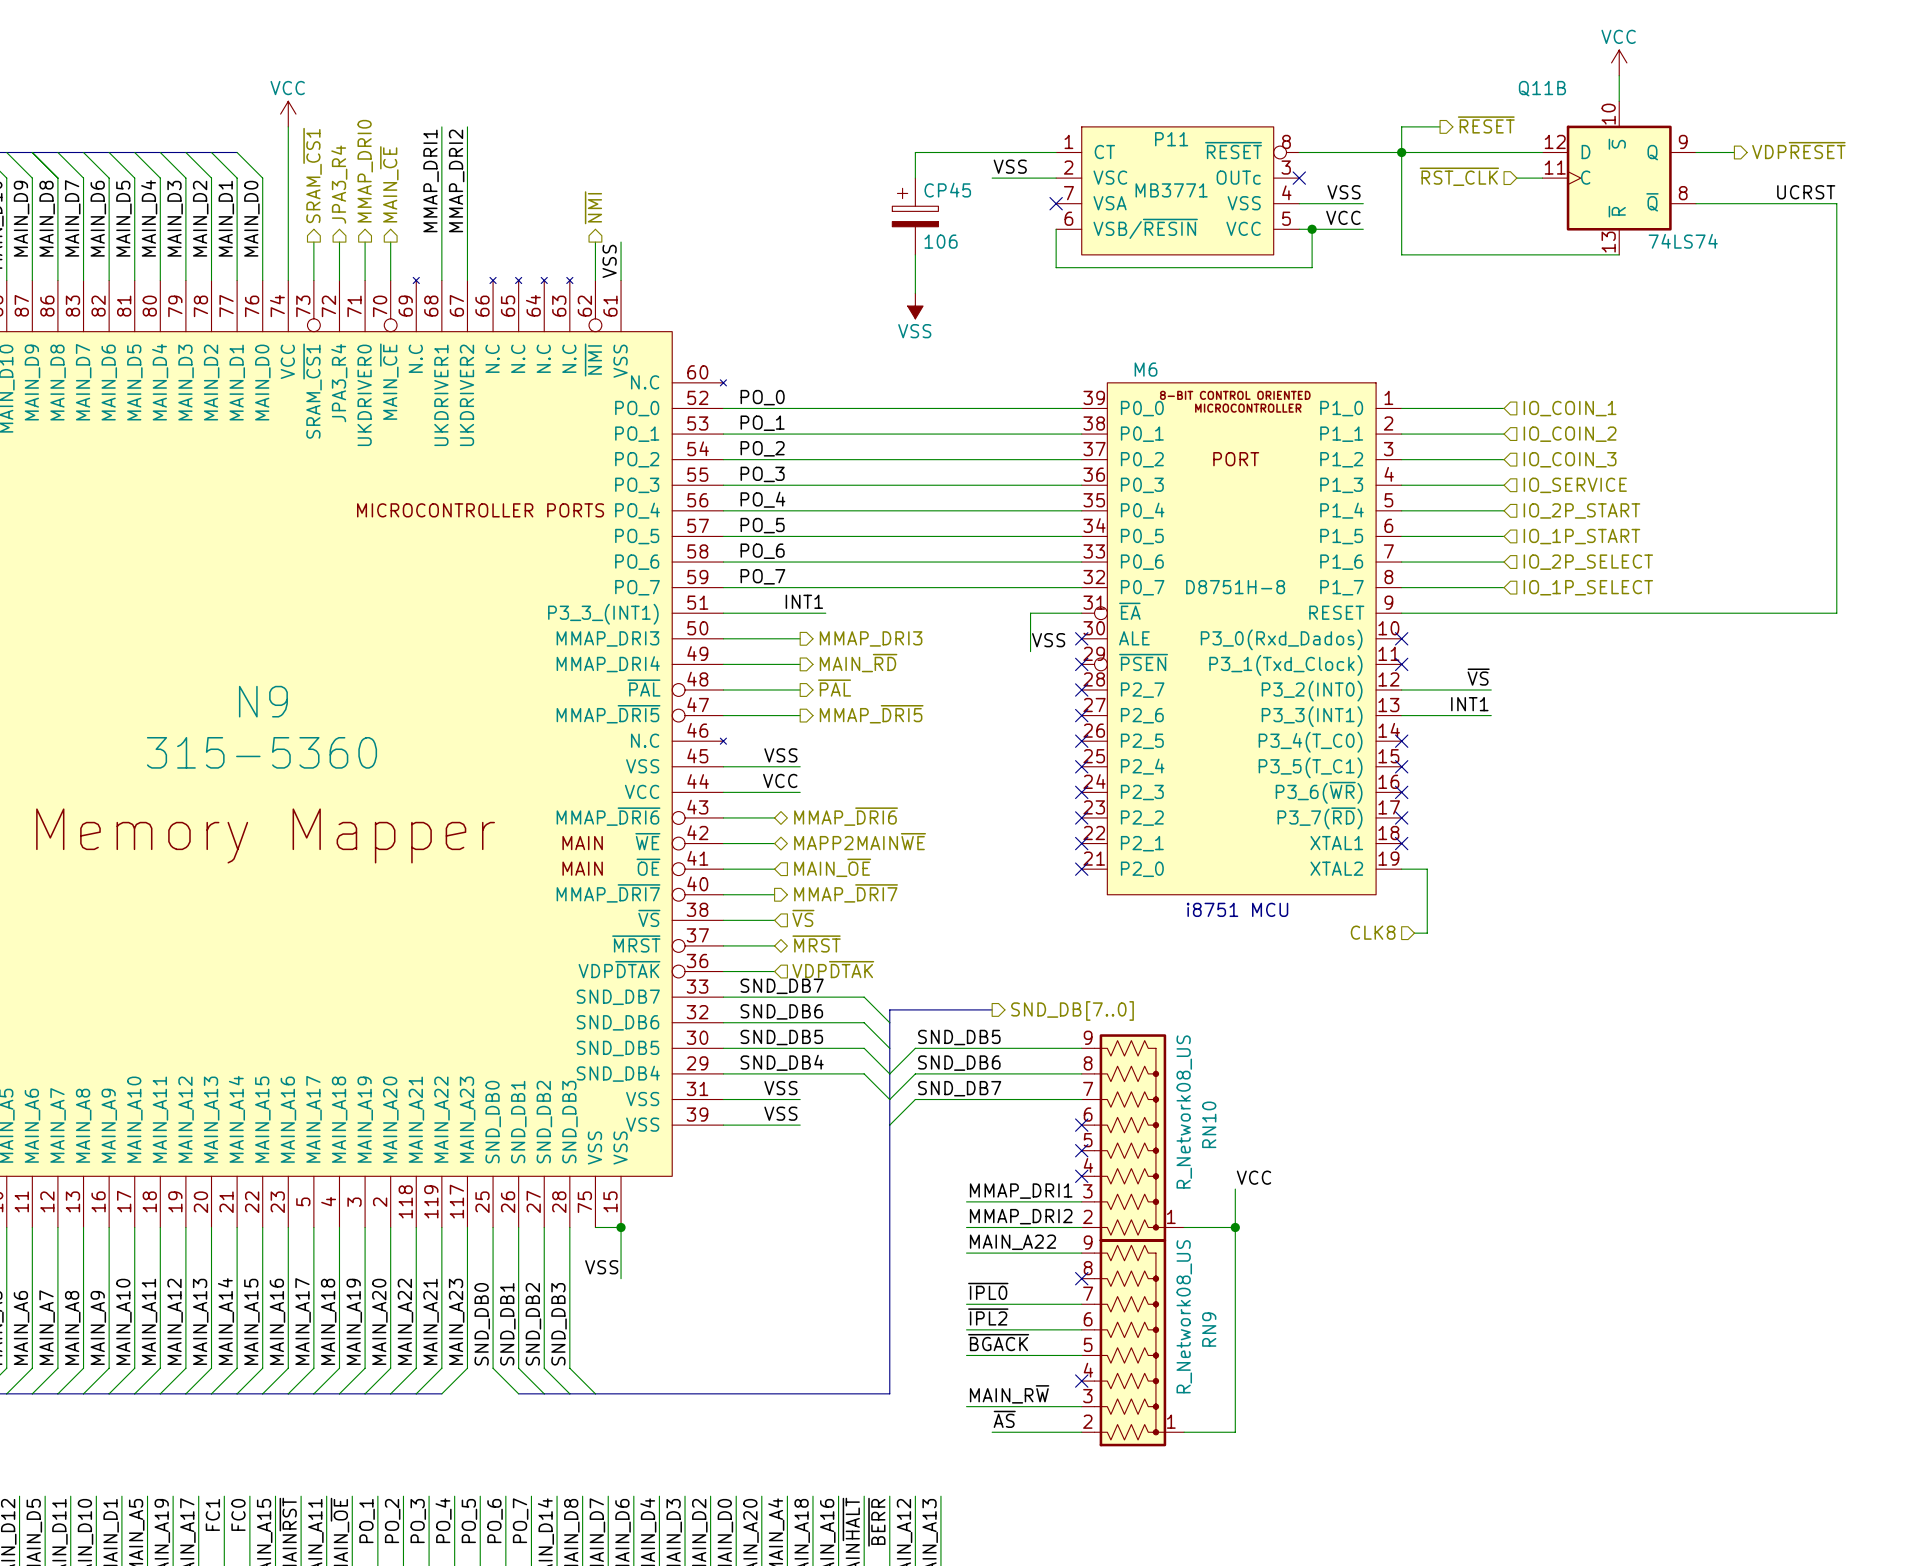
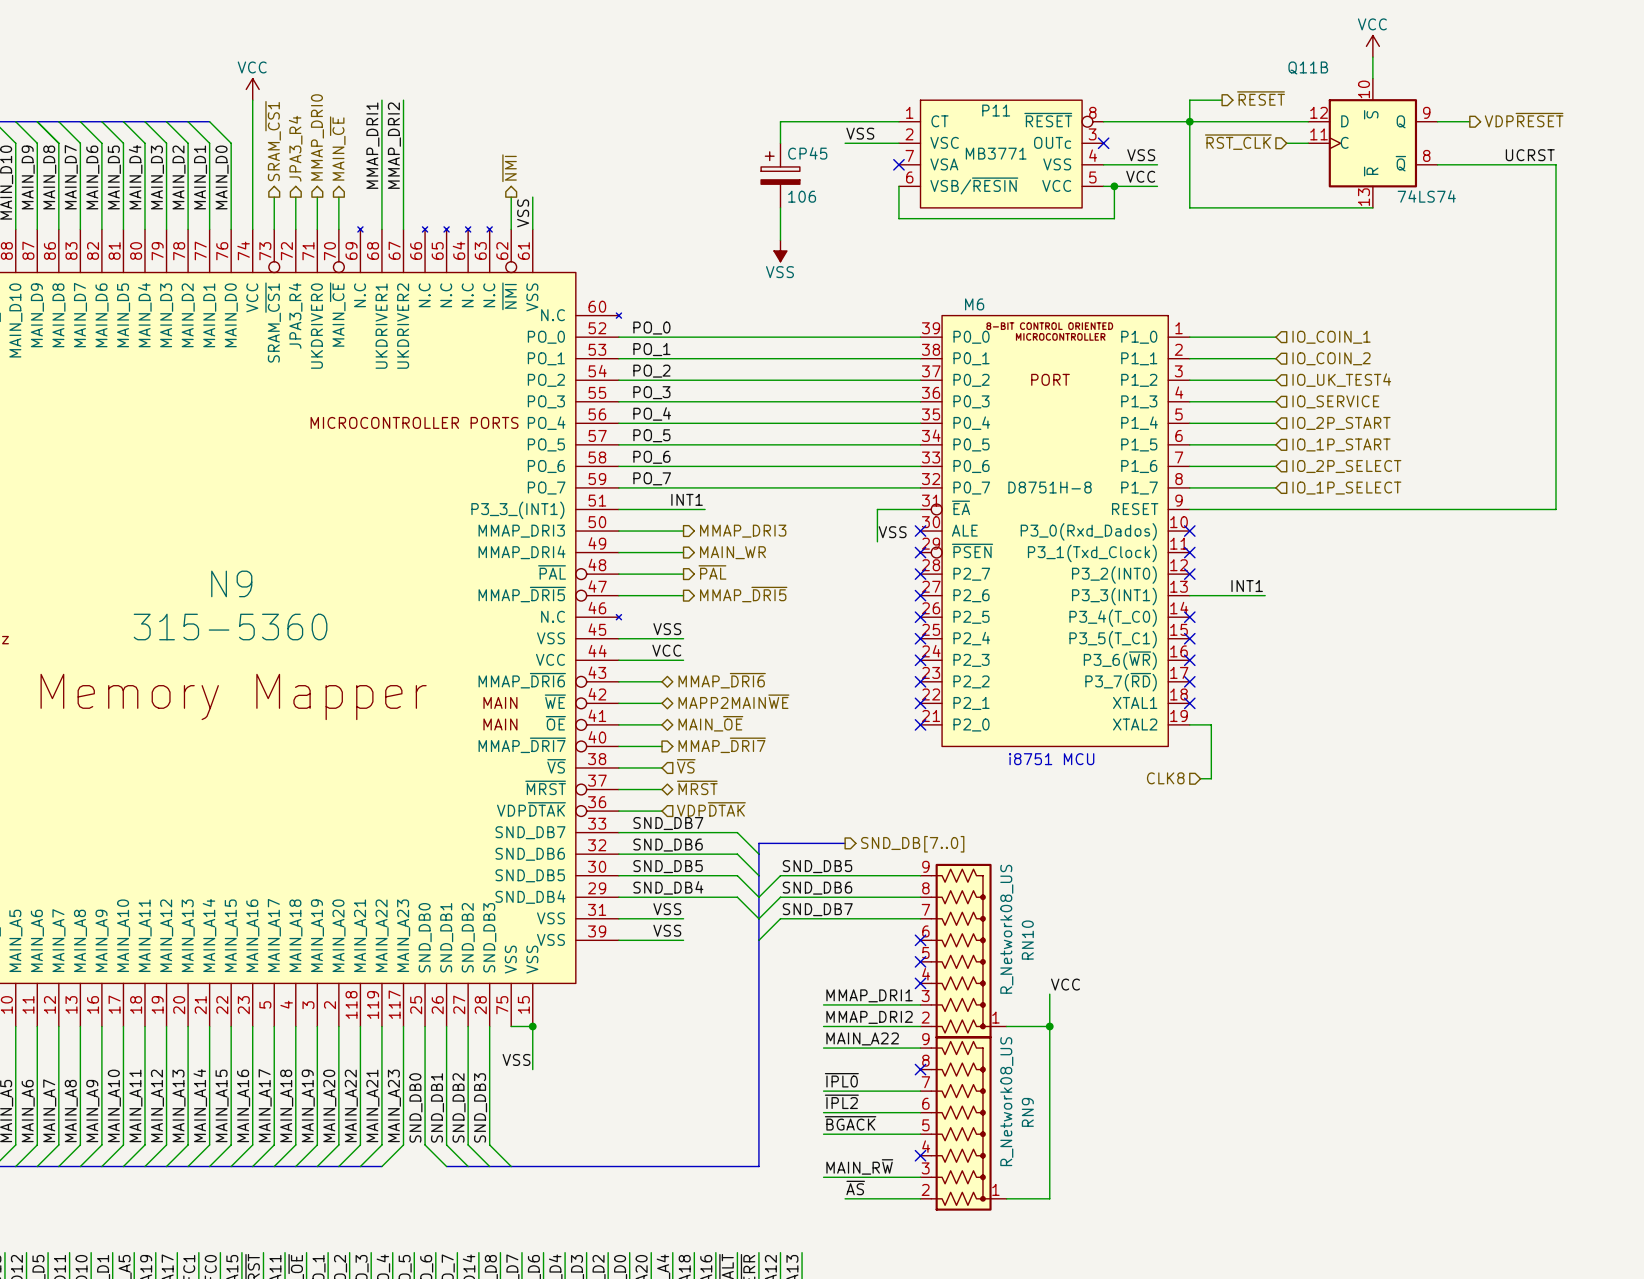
hierarchical label: IO_COIN_3 (1570, 459) -> IO_UK_TEST4 (1341, 380)
hierarchical label: MAIN_~{RD} (858, 663) -> MAIN_WR (732, 552)
label: ~{VS} (1478, 677) -> none
wire: (1401, 689) (1491, 689) -> none
no-connect mark: none -> (1189, 574)
hierarchical label shape: input (832, 867) -> bidirectional (710, 723)

